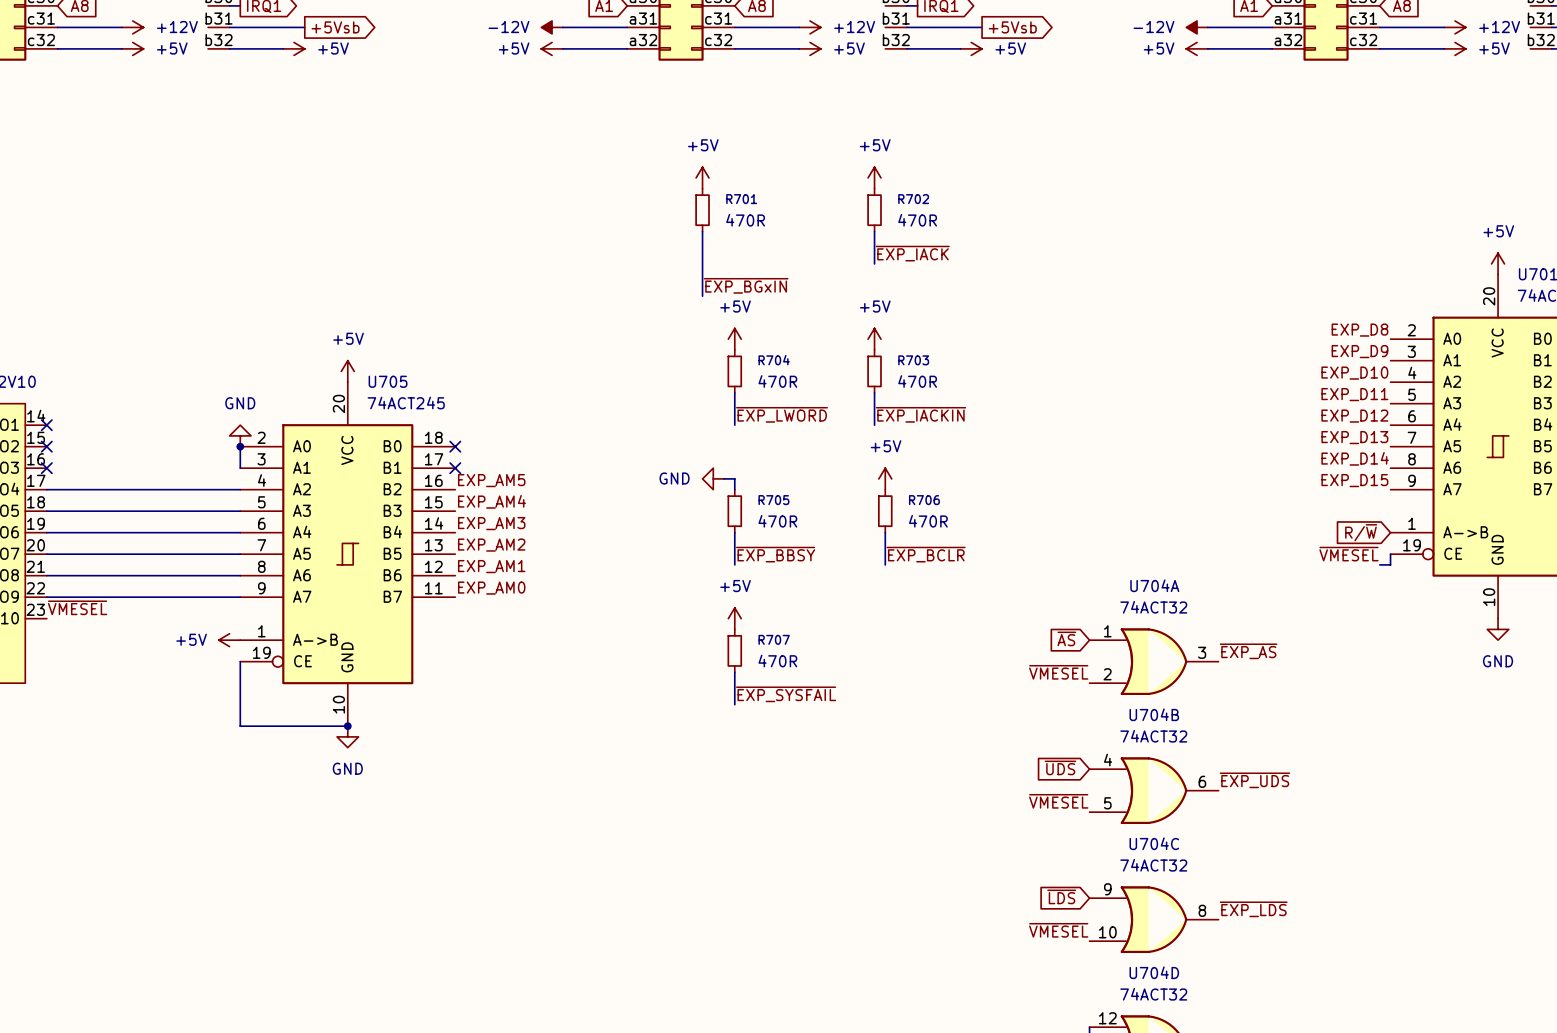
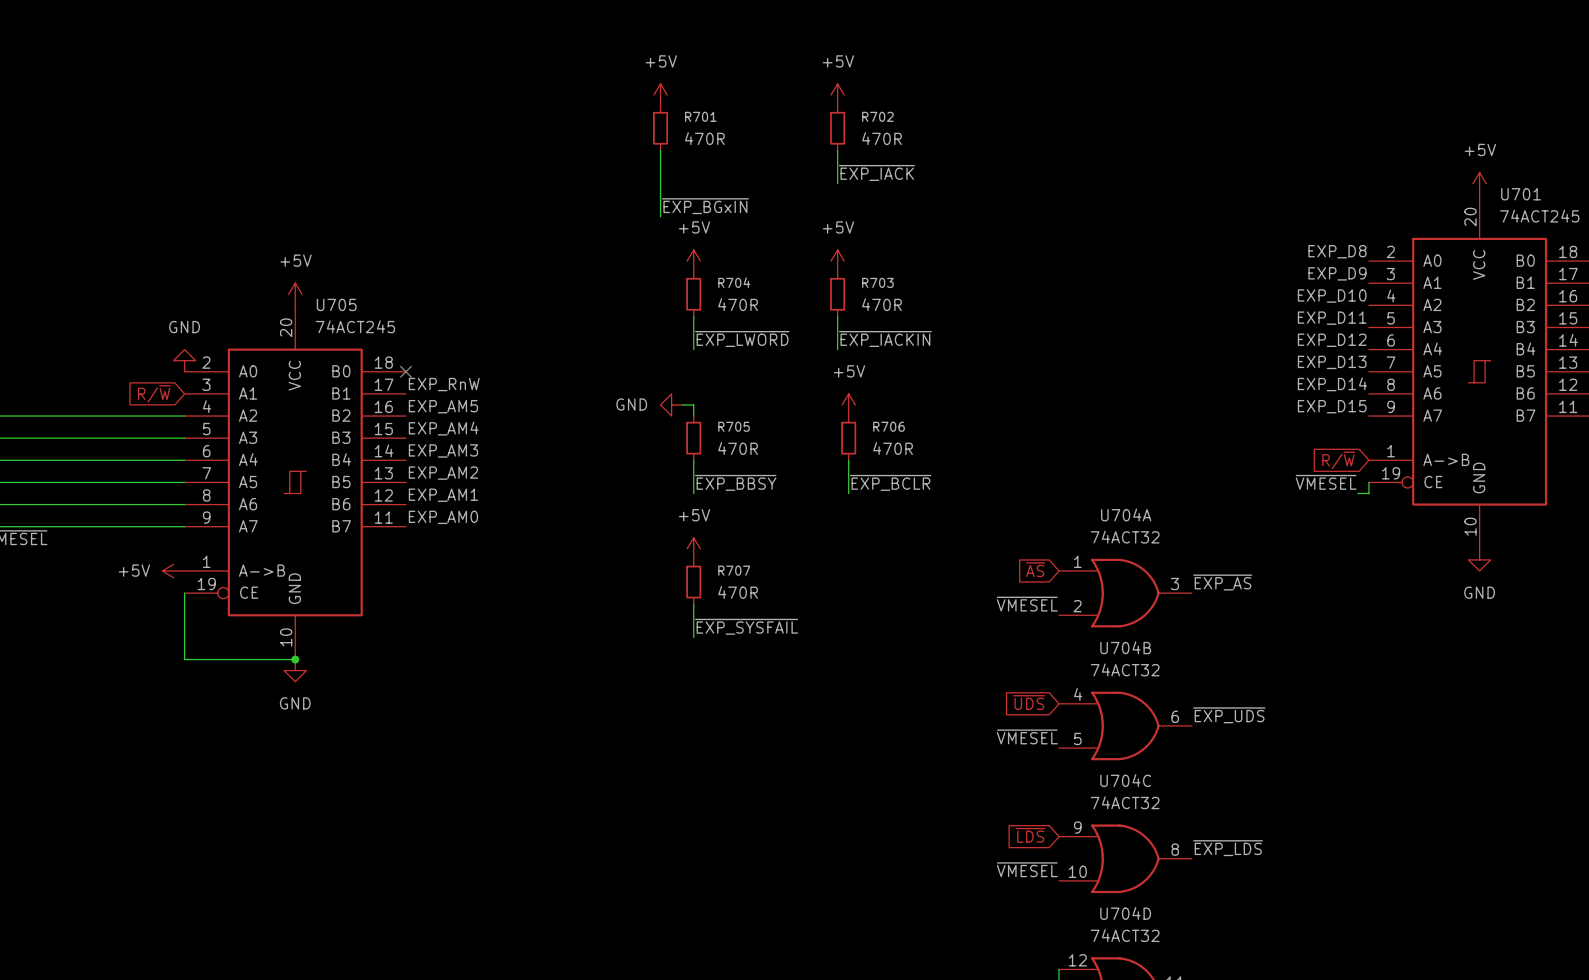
wire: (240, 446) (240, 468) -> none
junction: (240, 446) -> none
label: none -> EXP_RnW (444, 384)
global label: none -> R/~{W} (154, 393)
no-connect mark: (455, 468) -> none

